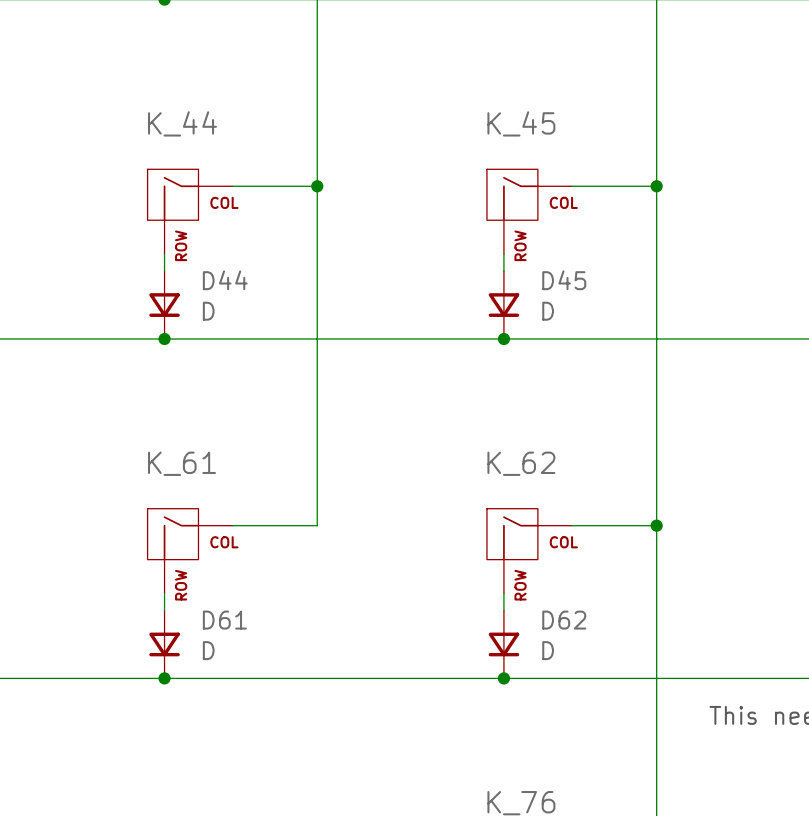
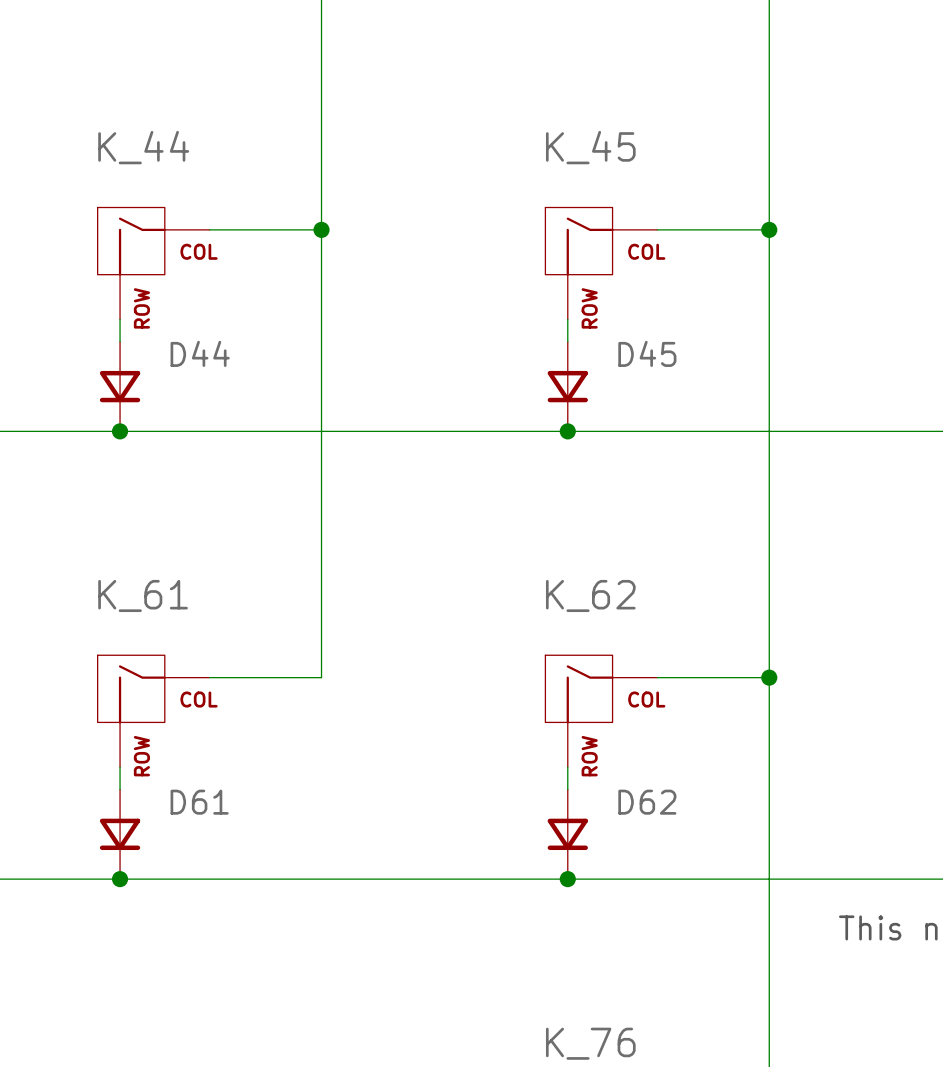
D44 value: D (208, 311) -> none
D45 value: D (548, 311) -> none
D61 value: D (208, 650) -> none
D62 value: D (548, 650) -> none

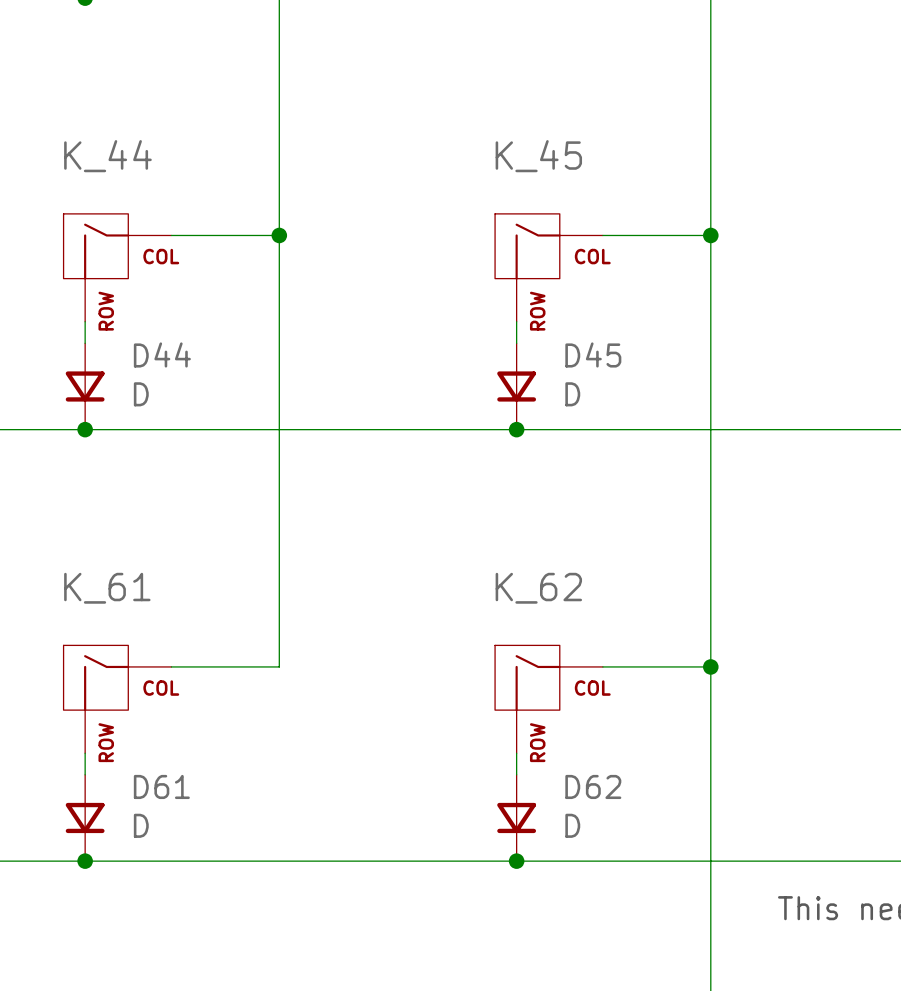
D44 value: none -> D (141, 394)
D45 value: none -> D (572, 394)
D61 value: none -> D (141, 825)
D62 value: none -> D (572, 825)

